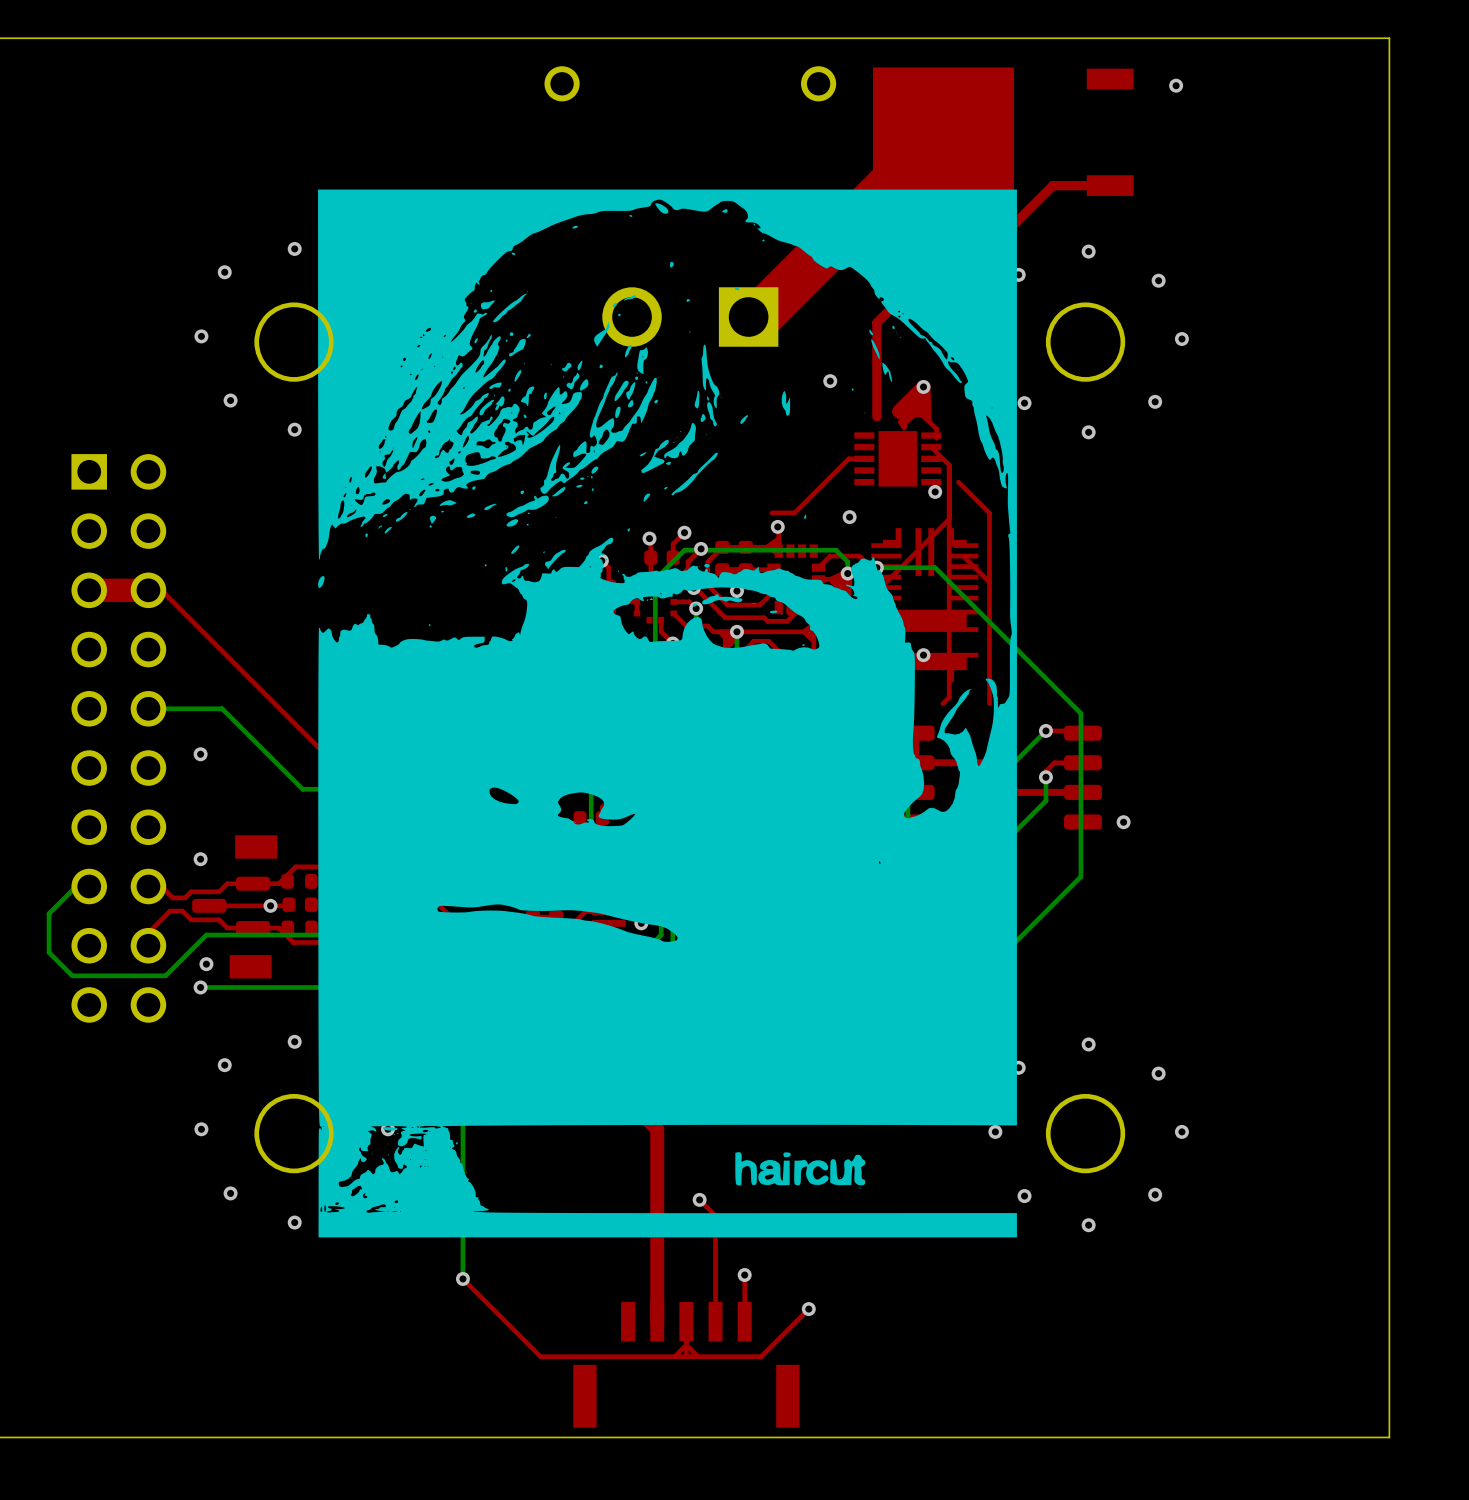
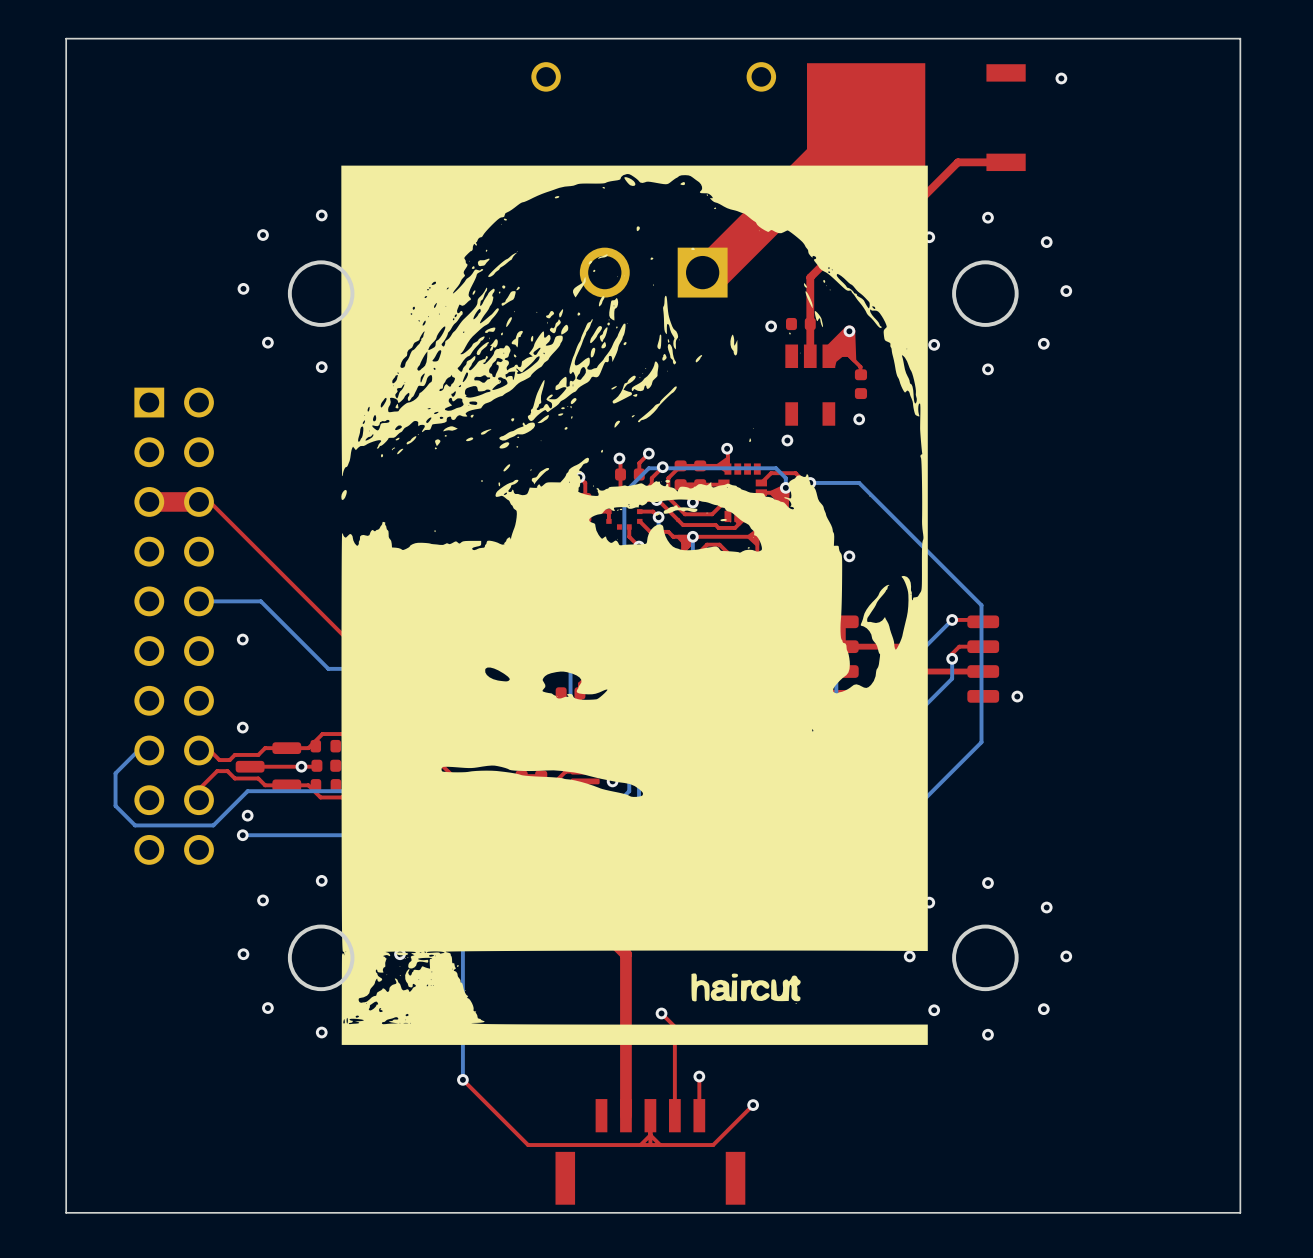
part: none -> (800, 324)
top track: (931, 447) (949, 465) (949, 697) (942, 703) -> none
part: none -> (860, 384)
part: none -> (810, 385)
top track: (864, 458) (848, 458) (794, 512) (771, 512) -> none
part: (897, 458) -> none
top track: (958, 482) (989, 513) (989, 703) -> none
top track: (949, 519) (858, 610) -> none
top track: (963, 556) (989, 582) -> none
part: (924, 605) -> none
part: (256, 846) -> none
part: (250, 966) -> none

